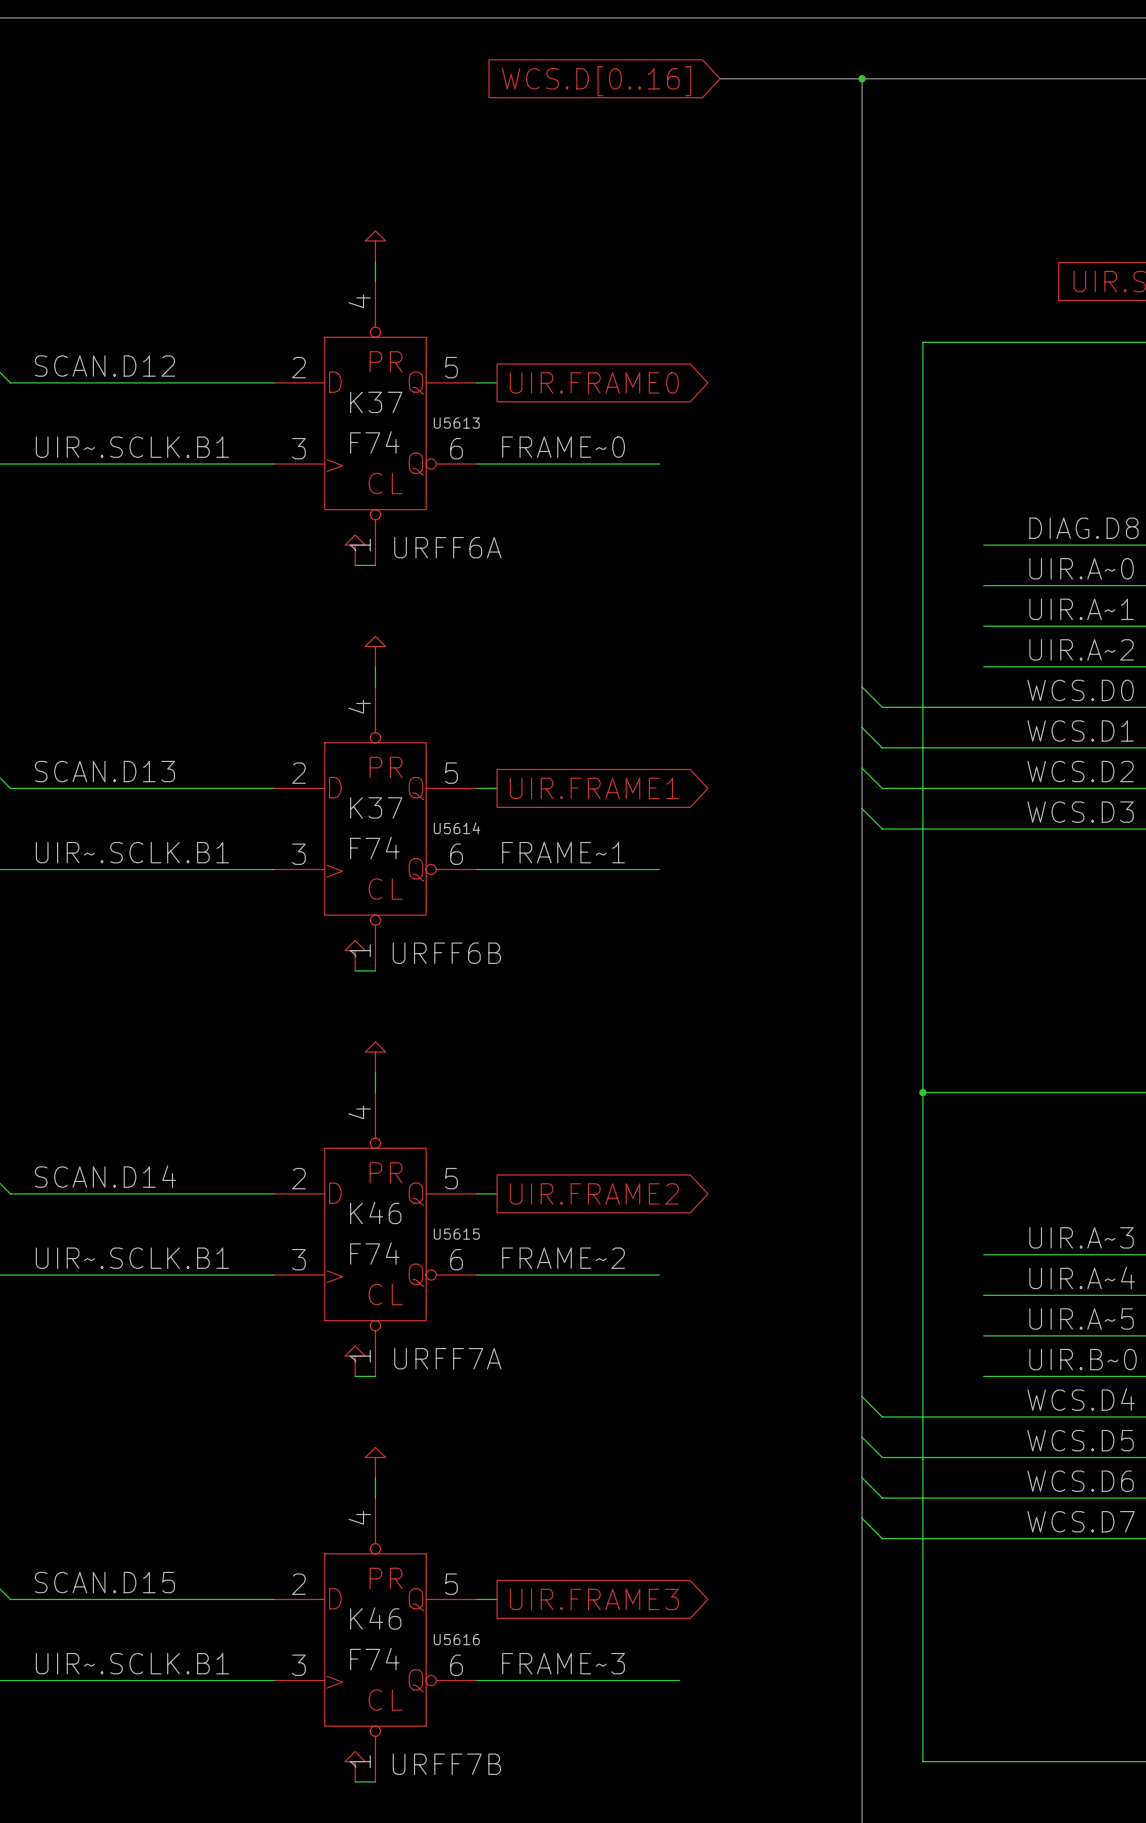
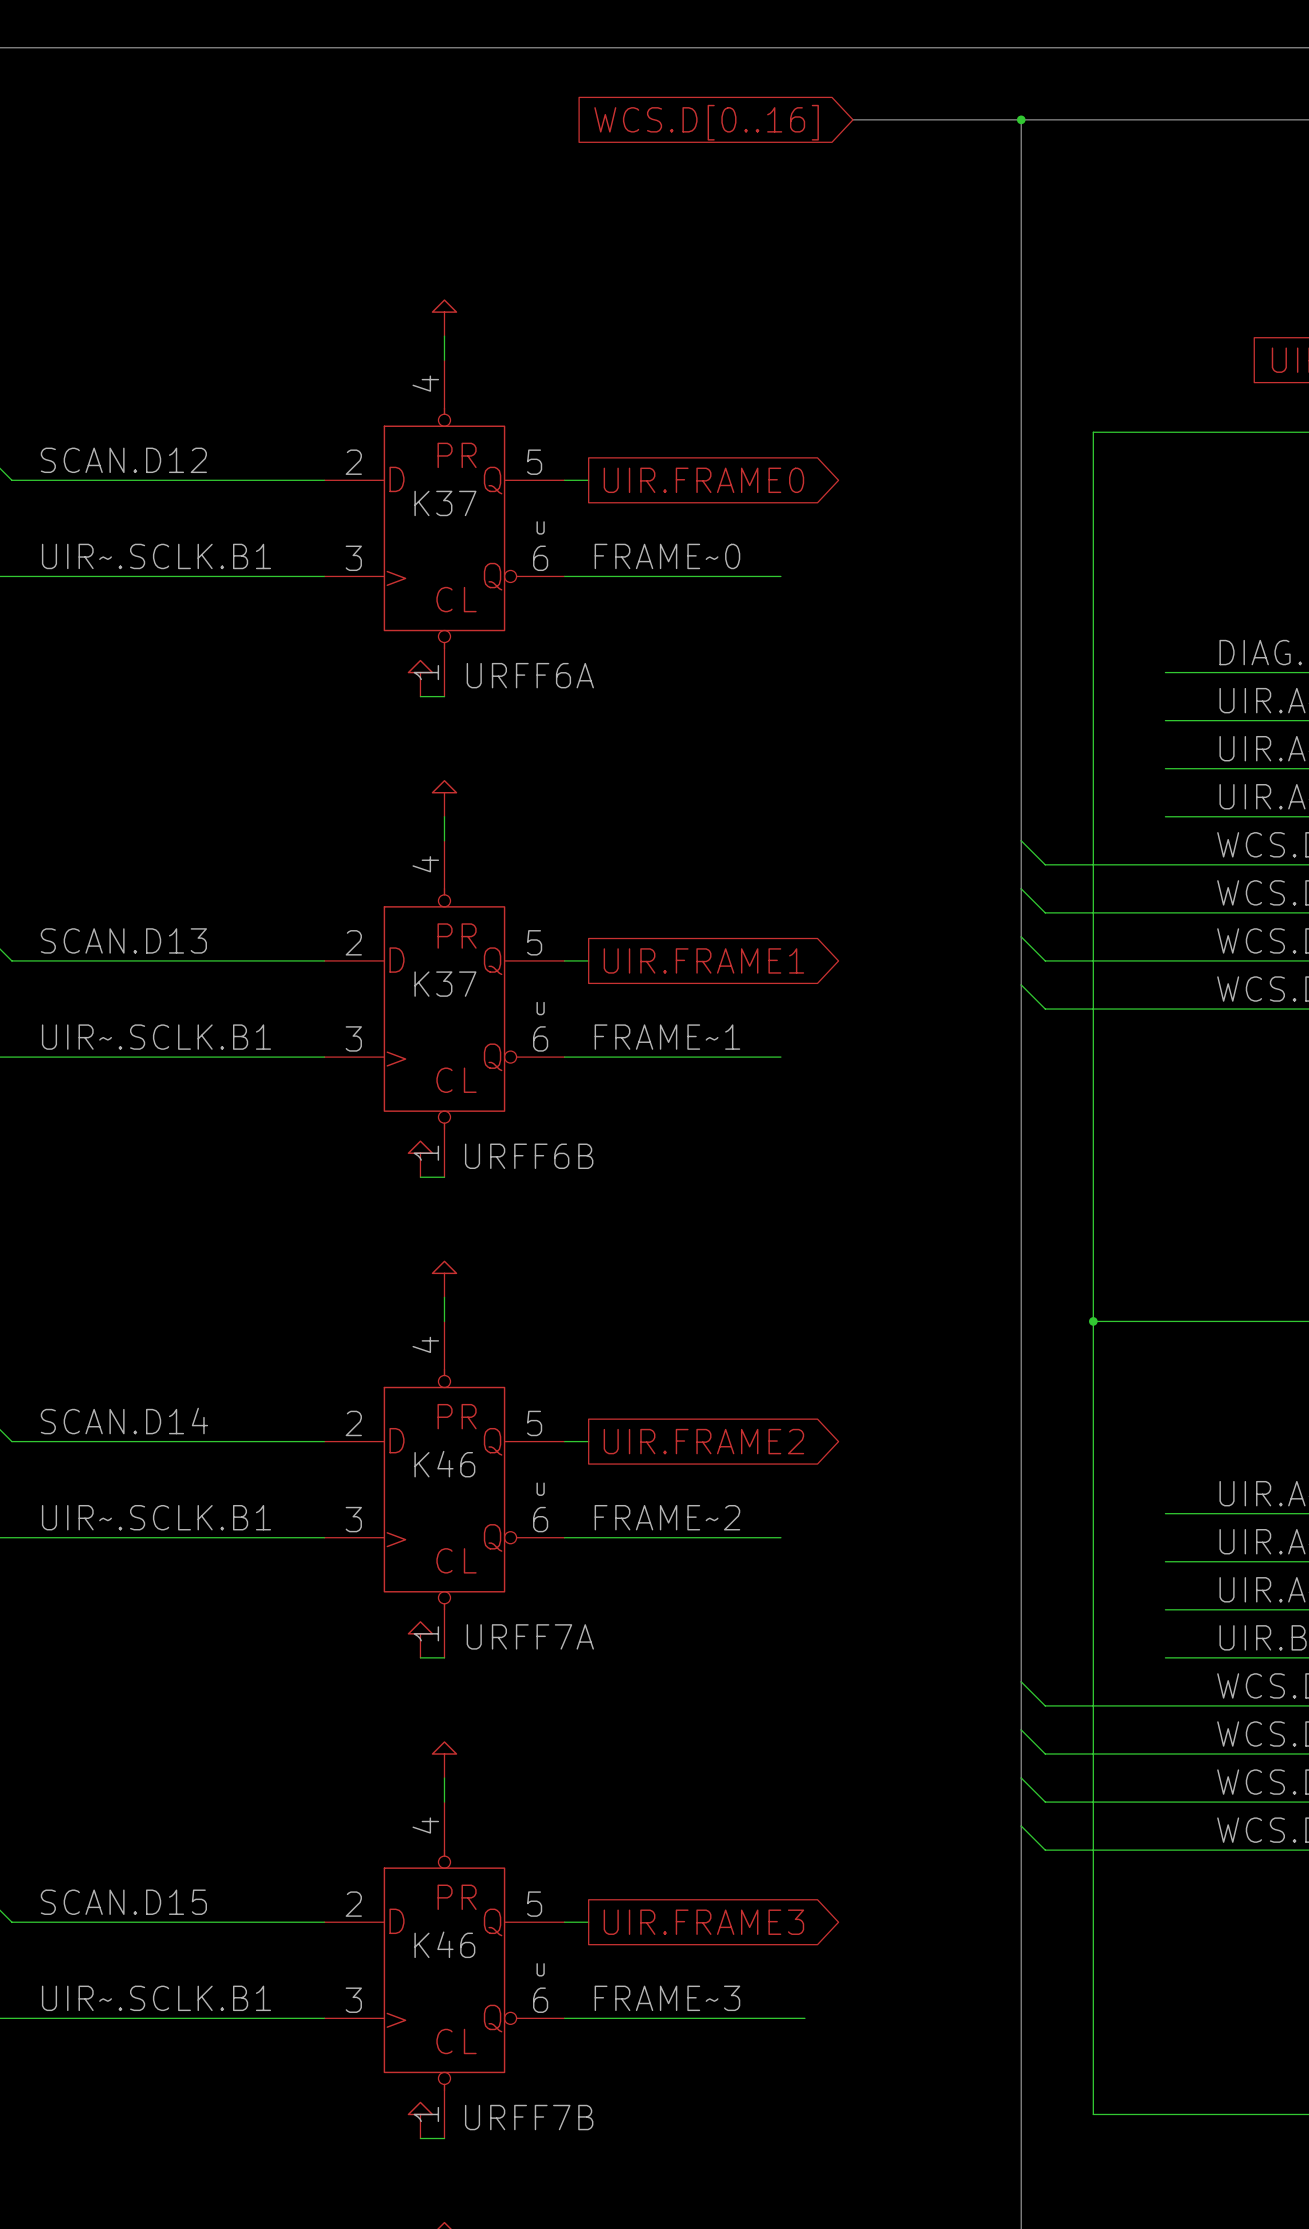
U5613 name: U5613 (456, 423) -> U (540, 527)
U5613 value: F74 (374, 442) -> none
U5614 name: U5614 (457, 828) -> U (540, 1008)
U5614 value: F74 (374, 848) -> none
U5615 name: U5615 (456, 1234) -> U (540, 1489)
U5615 value: F74 (374, 1253) -> none
U5616 name: U5616 (456, 1639) -> U (540, 1969)
U5616 value: F74 (374, 1659) -> none

